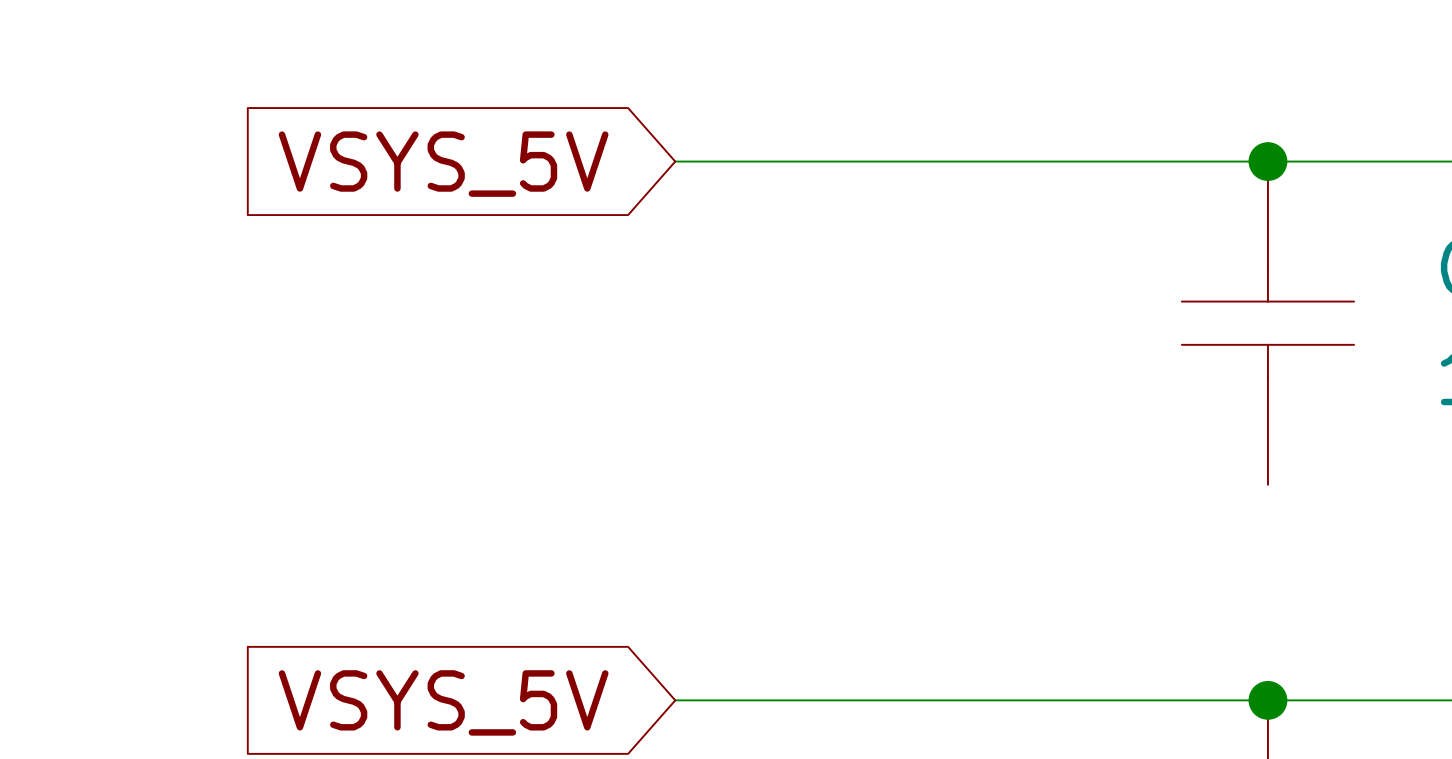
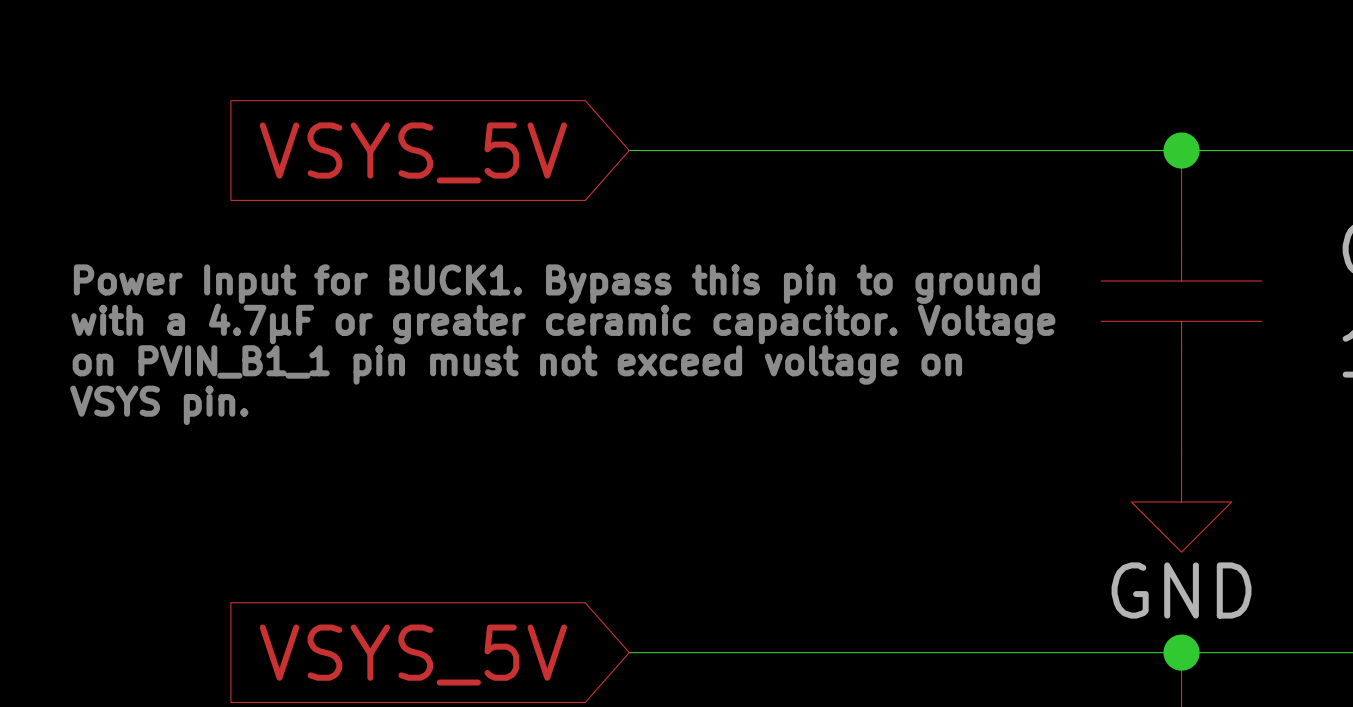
text: none -> Power Input for BUCK1. Bypass this pin to ground (556, 284)
text: none -> with a 4.7μF or greater ceramic capacitor. Voltage (563, 323)
text: none -> on PVIN_B1_1 pin must not exceed voltage on (517, 364)
text: none -> VSYS pin. (159, 405)
power symbol: none -> GND (1181, 502)

